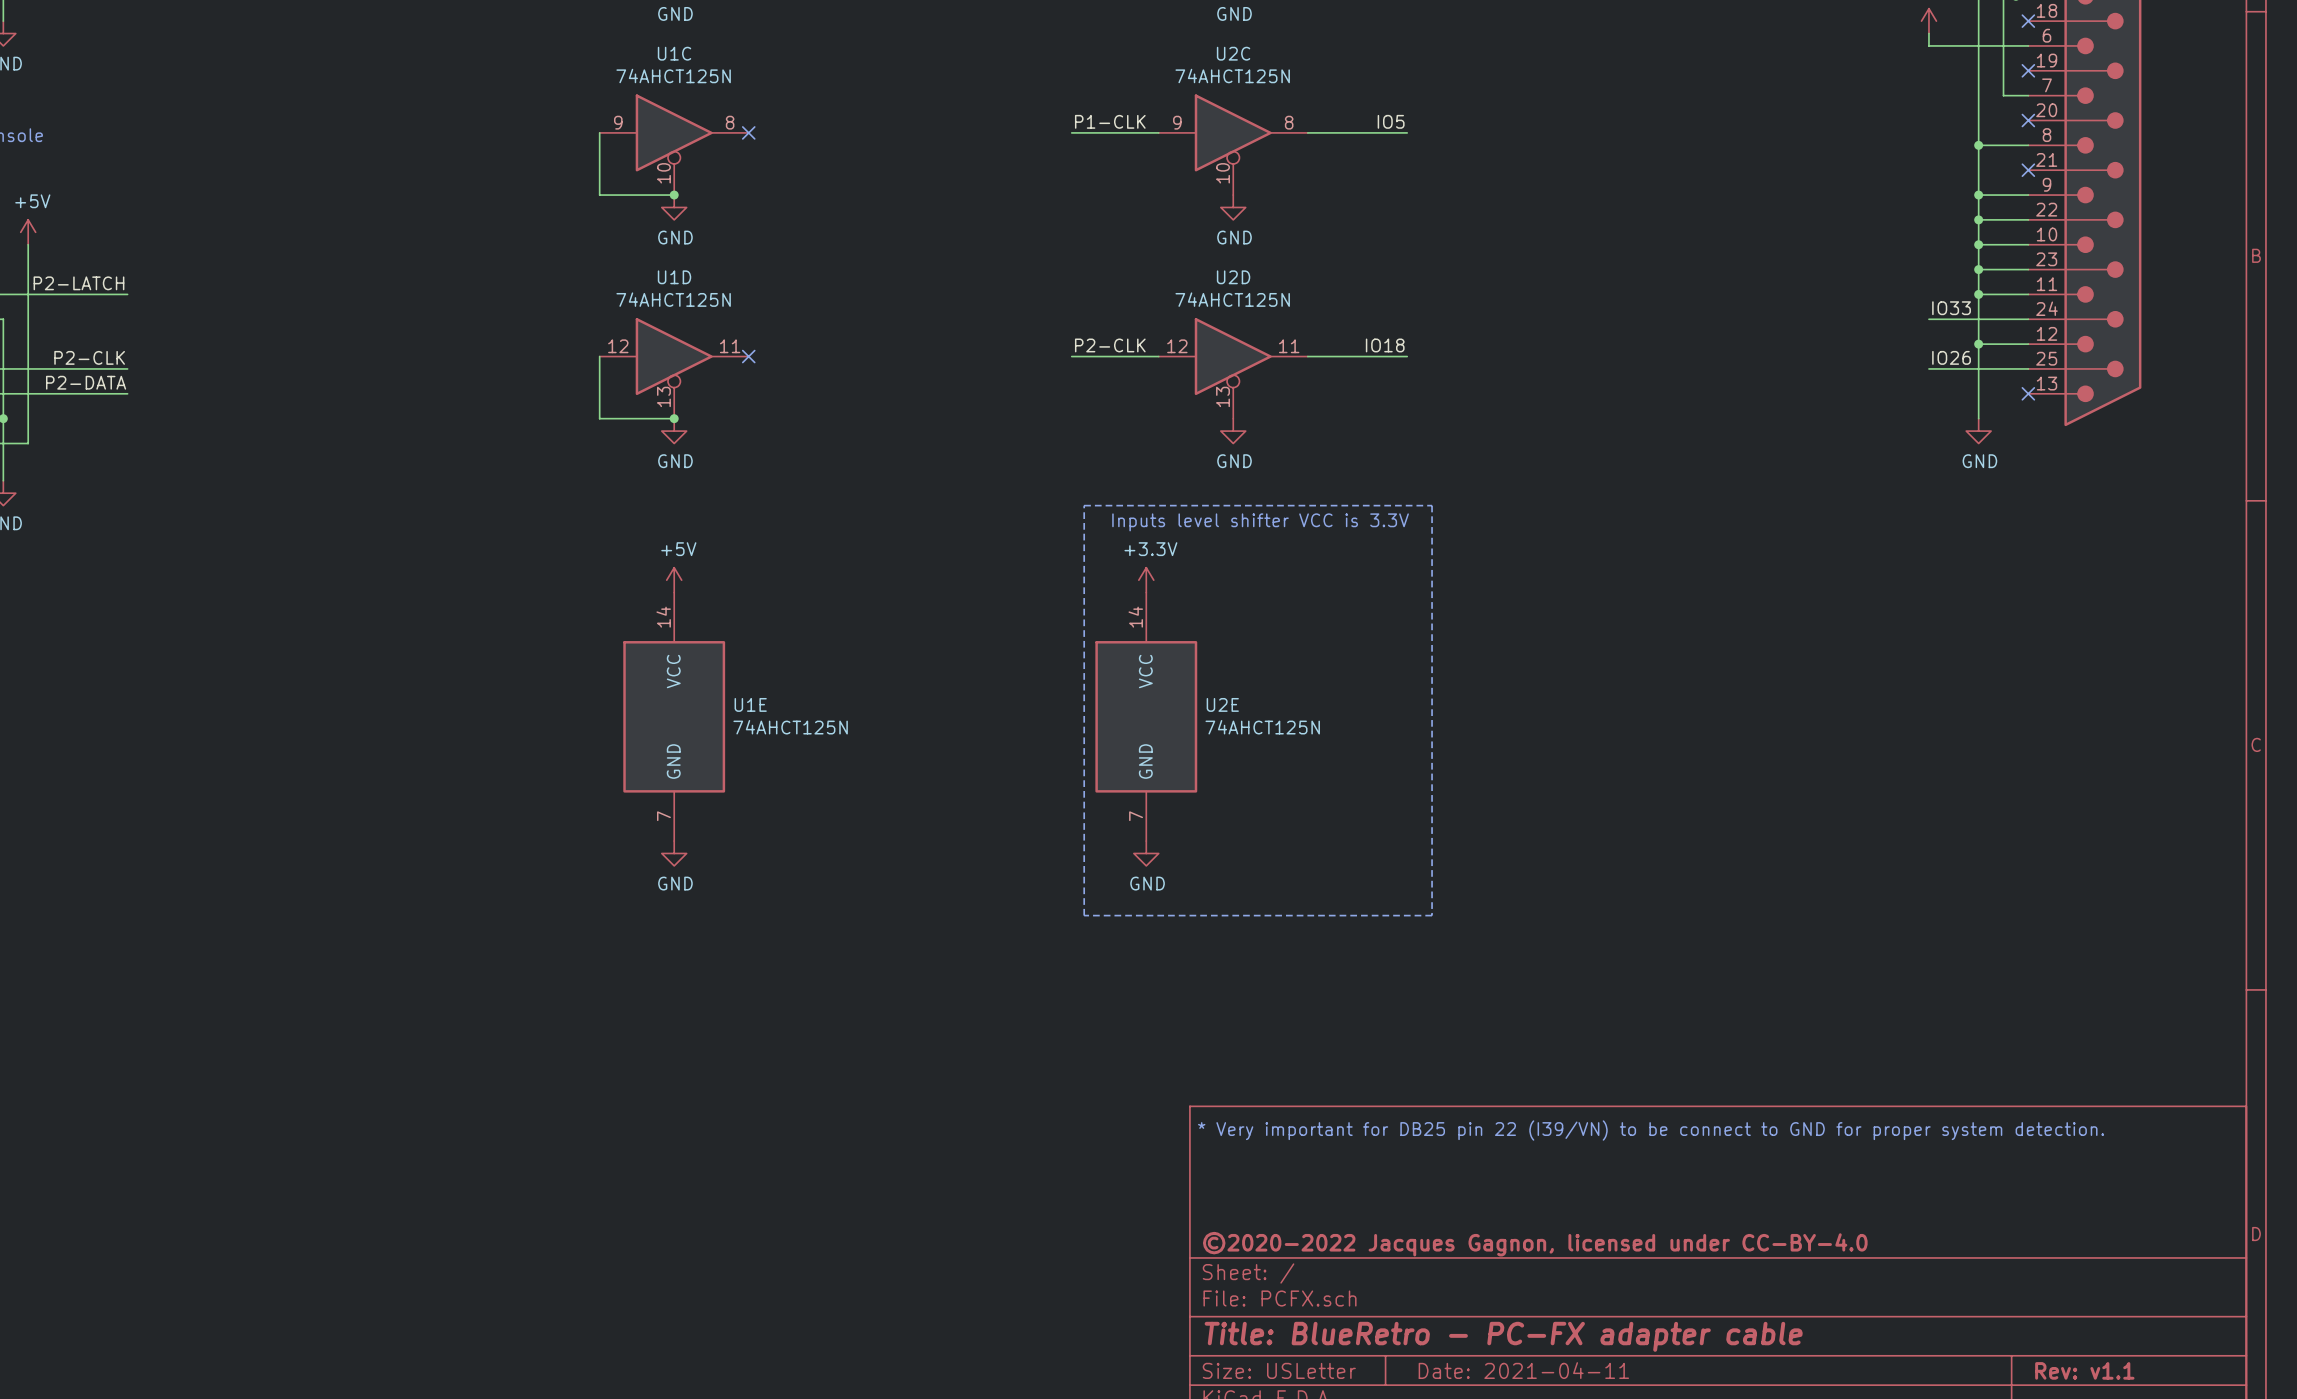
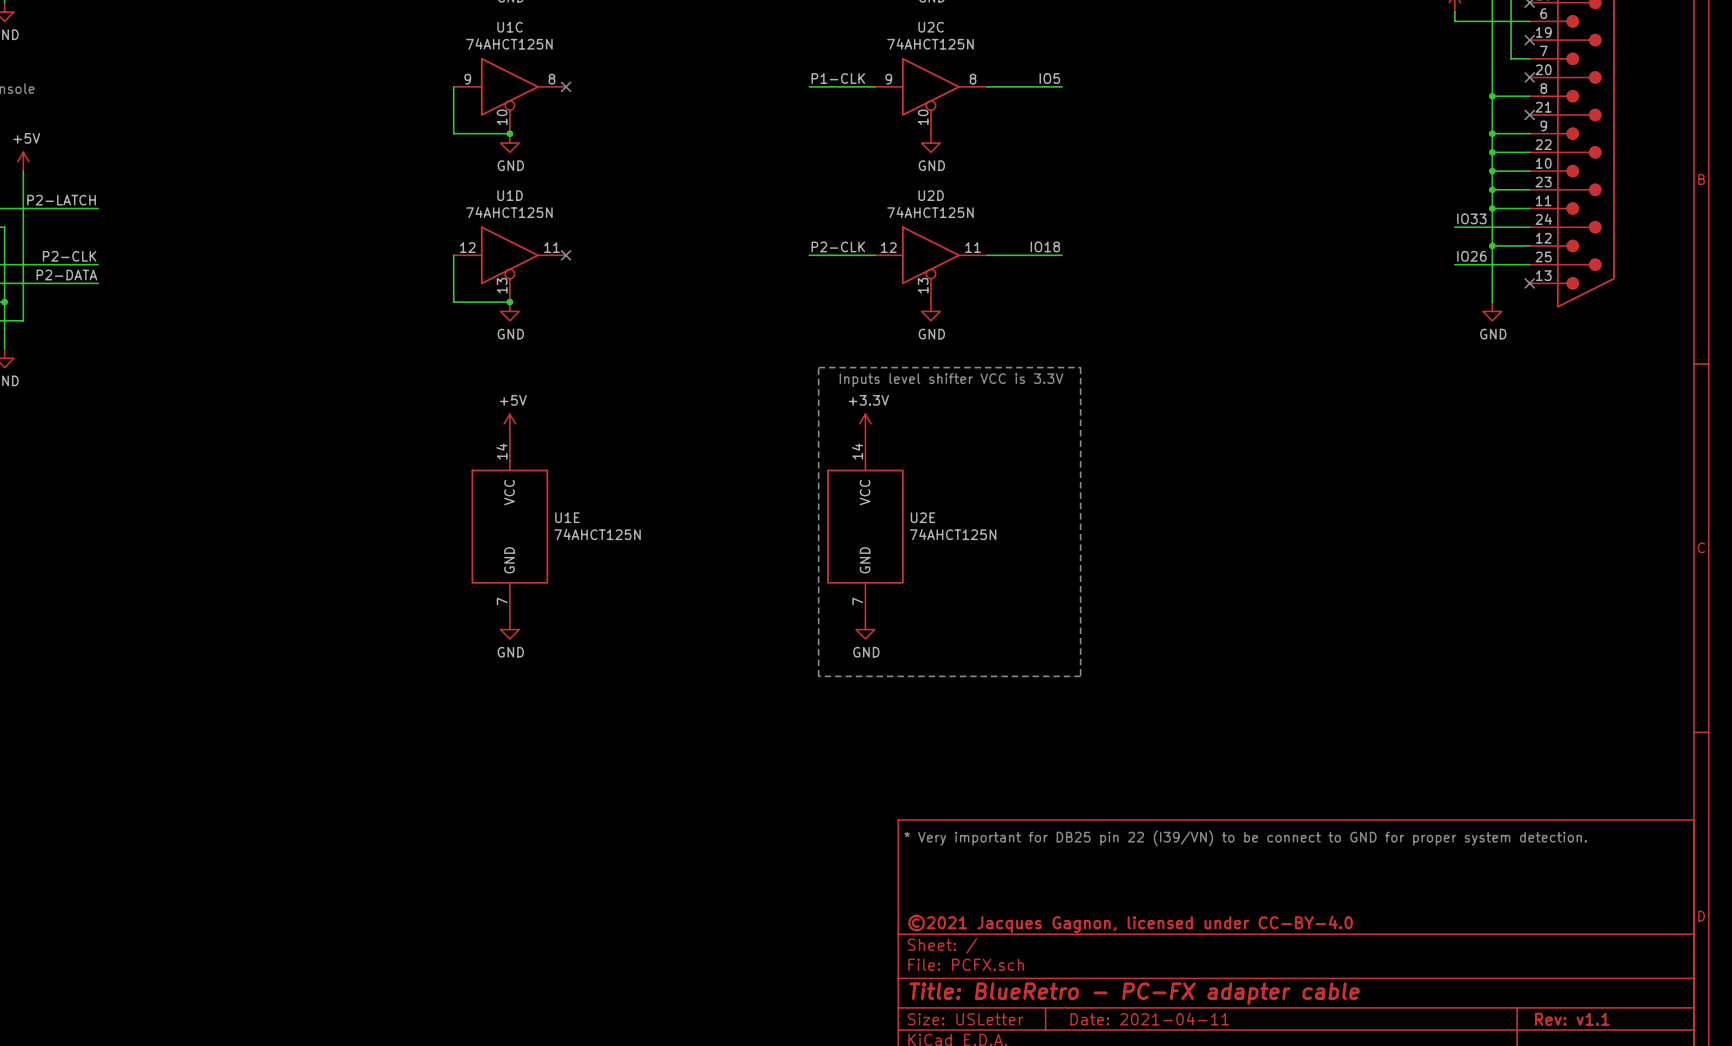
title block: ©2020-2022 Jacques Gagnon, licensed under CC-BY-4.0 (1535, 1244) -> ©2021 Jacques Gagnon, licensed under CC-BY-4.0 (1130, 923)

